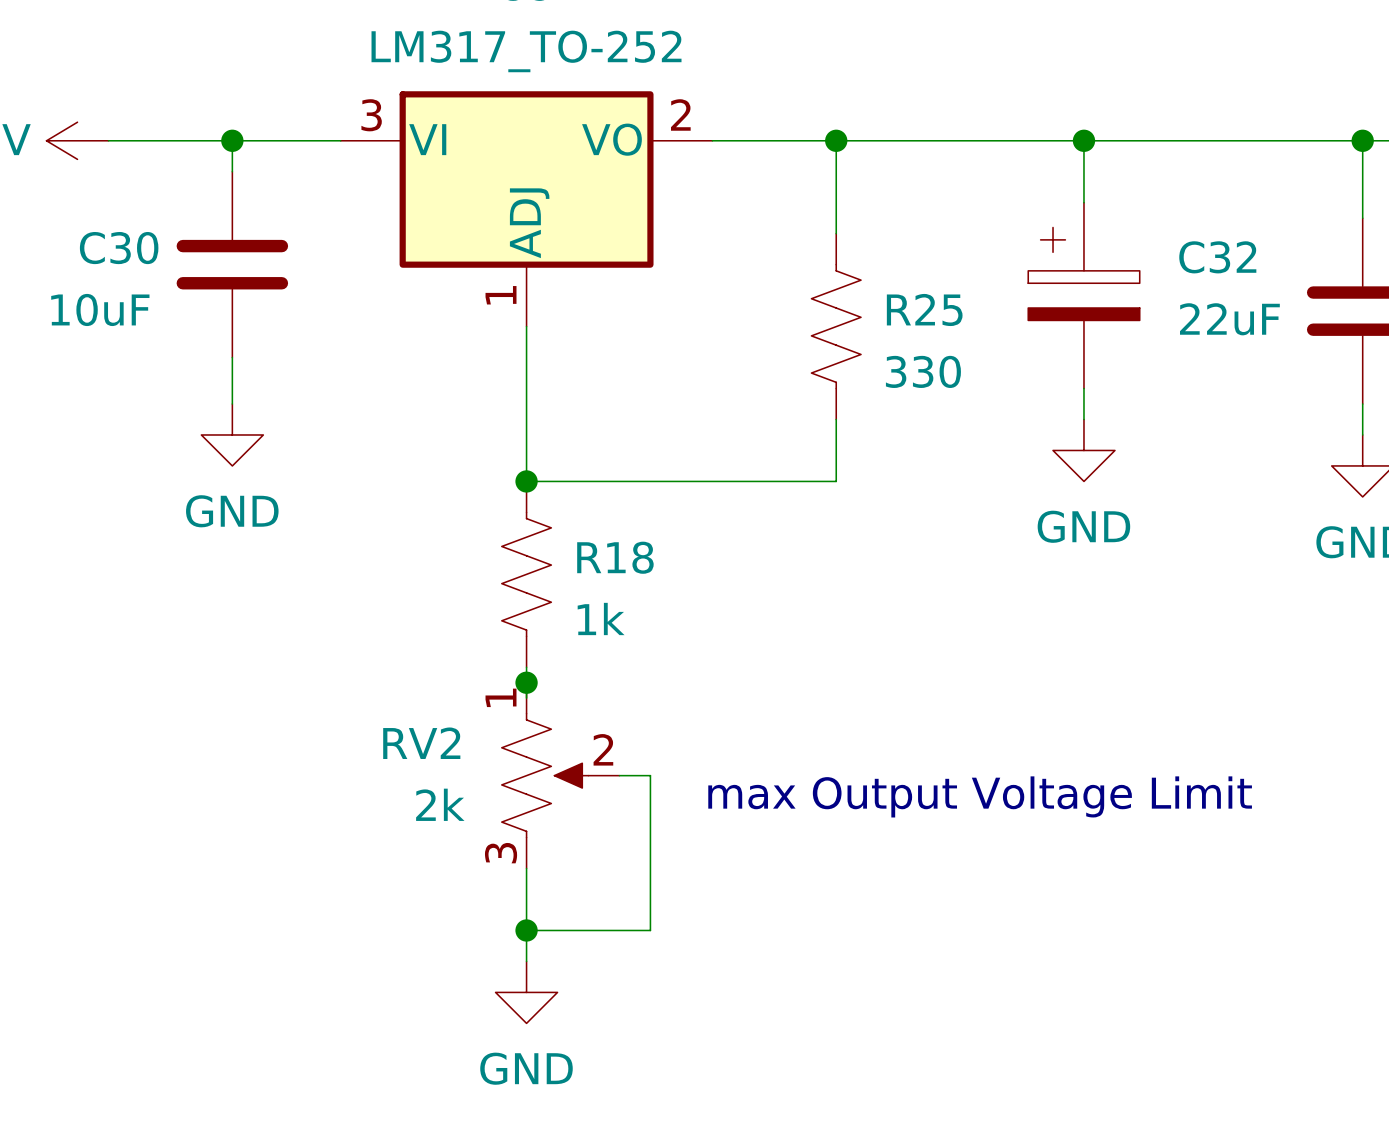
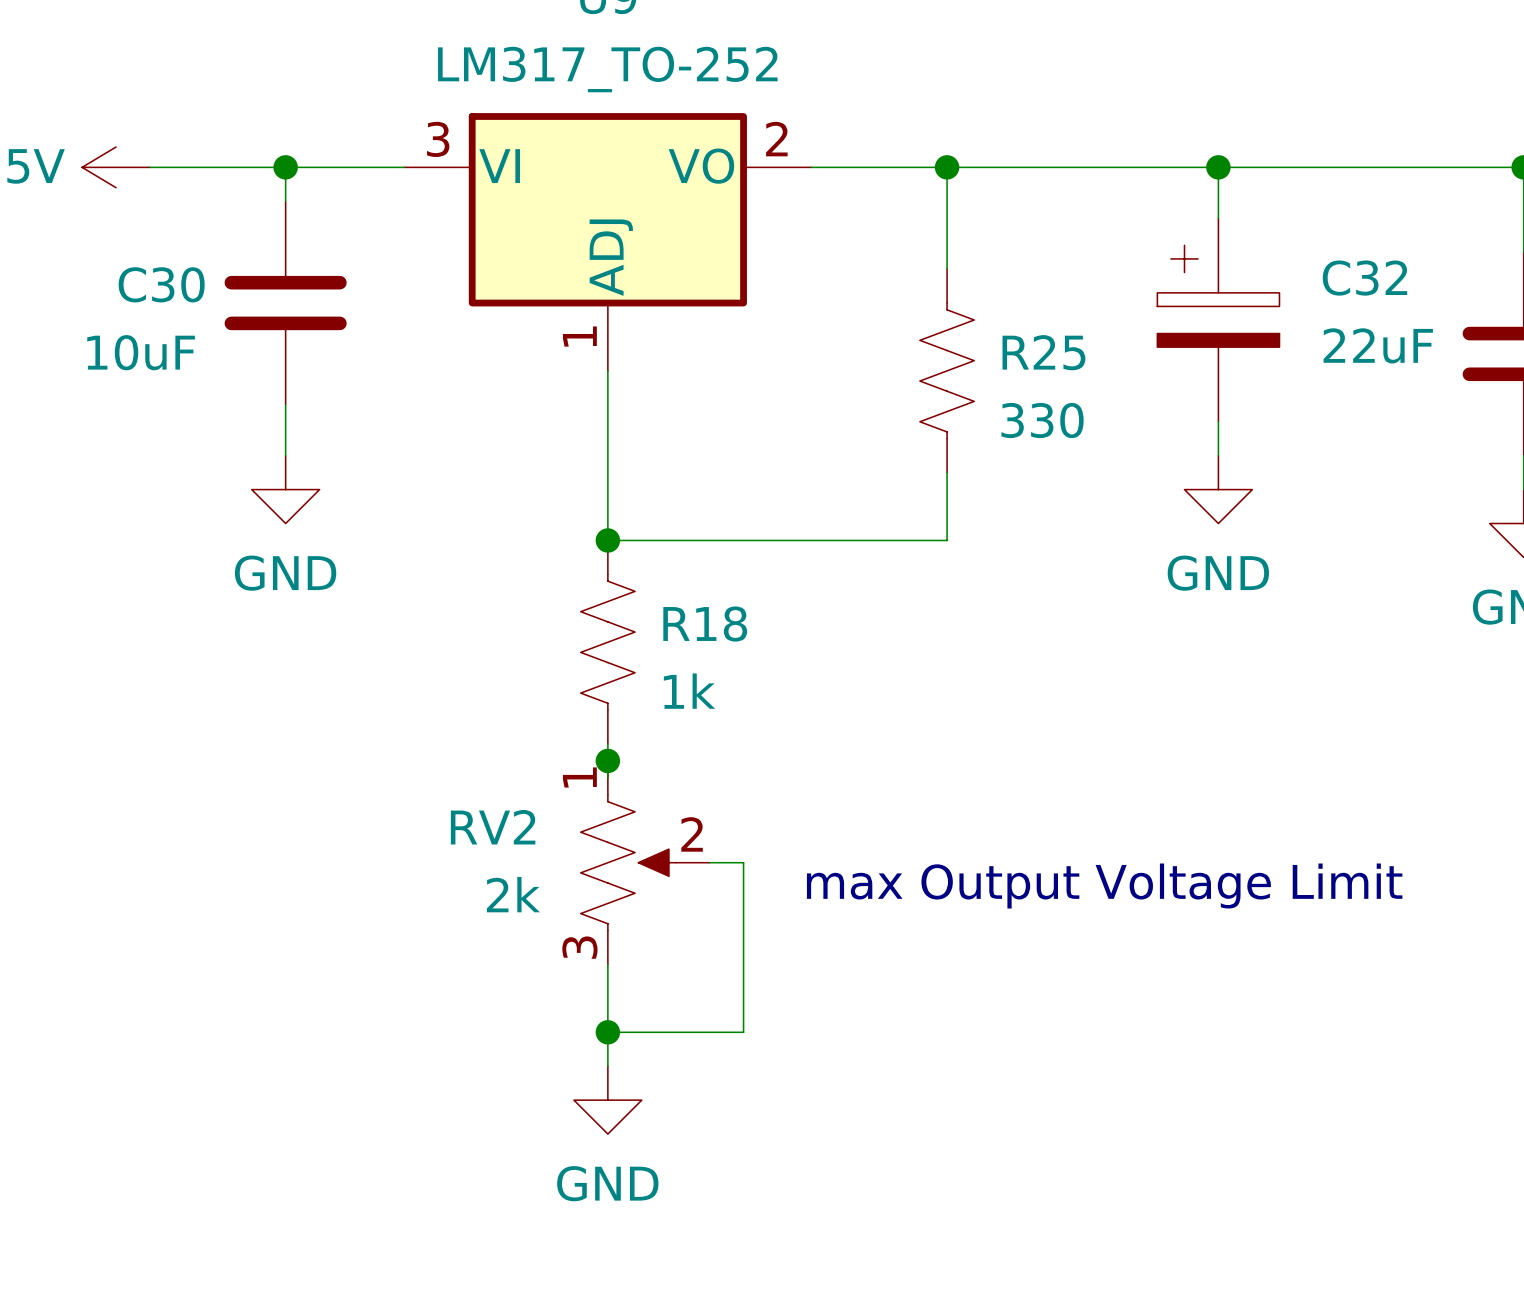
C32 position: (1083, 295) -> (1218, 320)
power symbol position: GND (1083, 450) -> GND (1218, 489)

